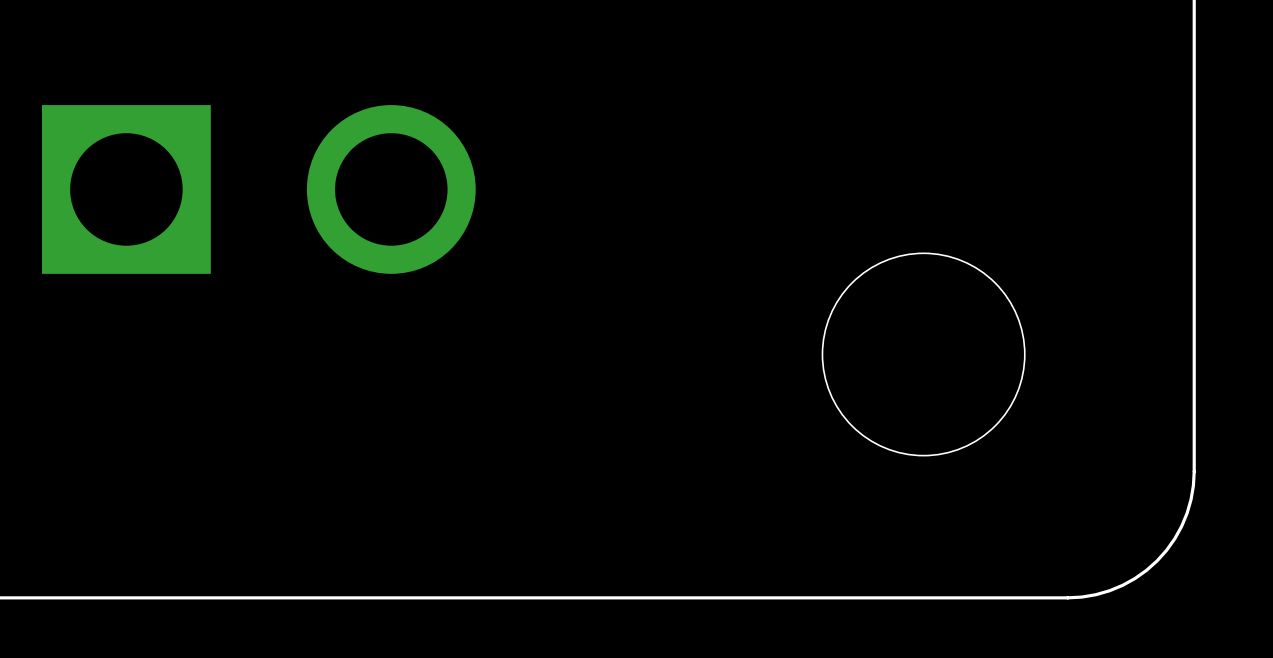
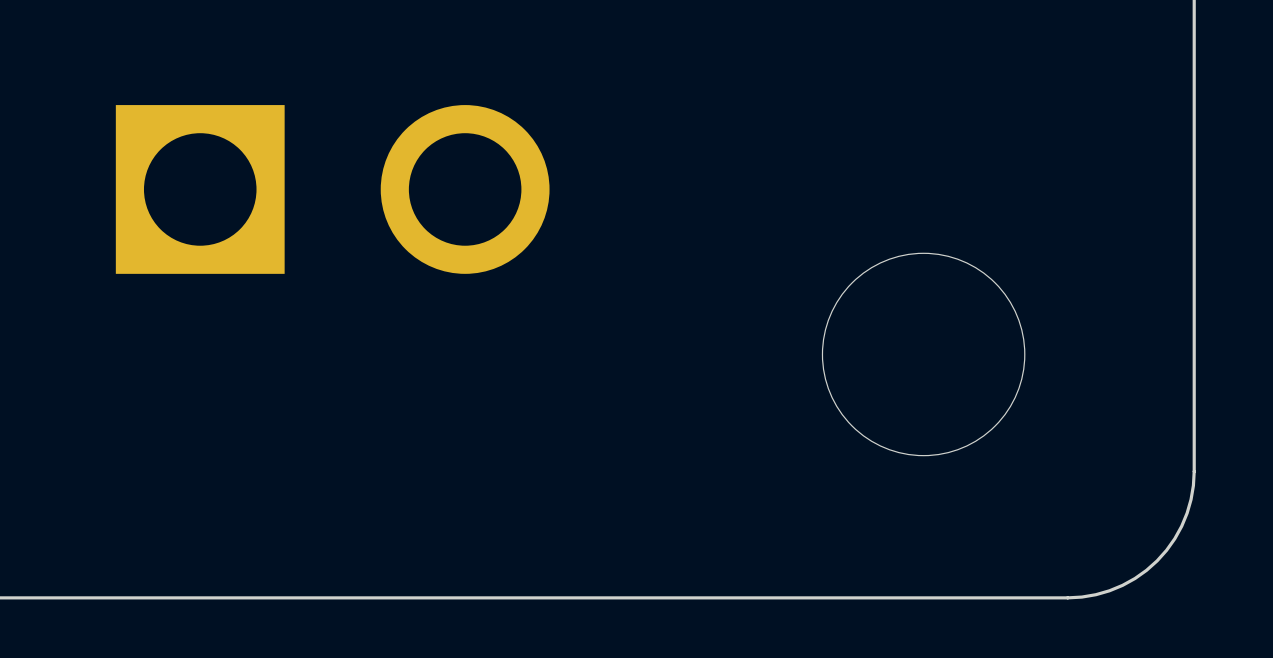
part position: (258, 189) -> (332, 189)

